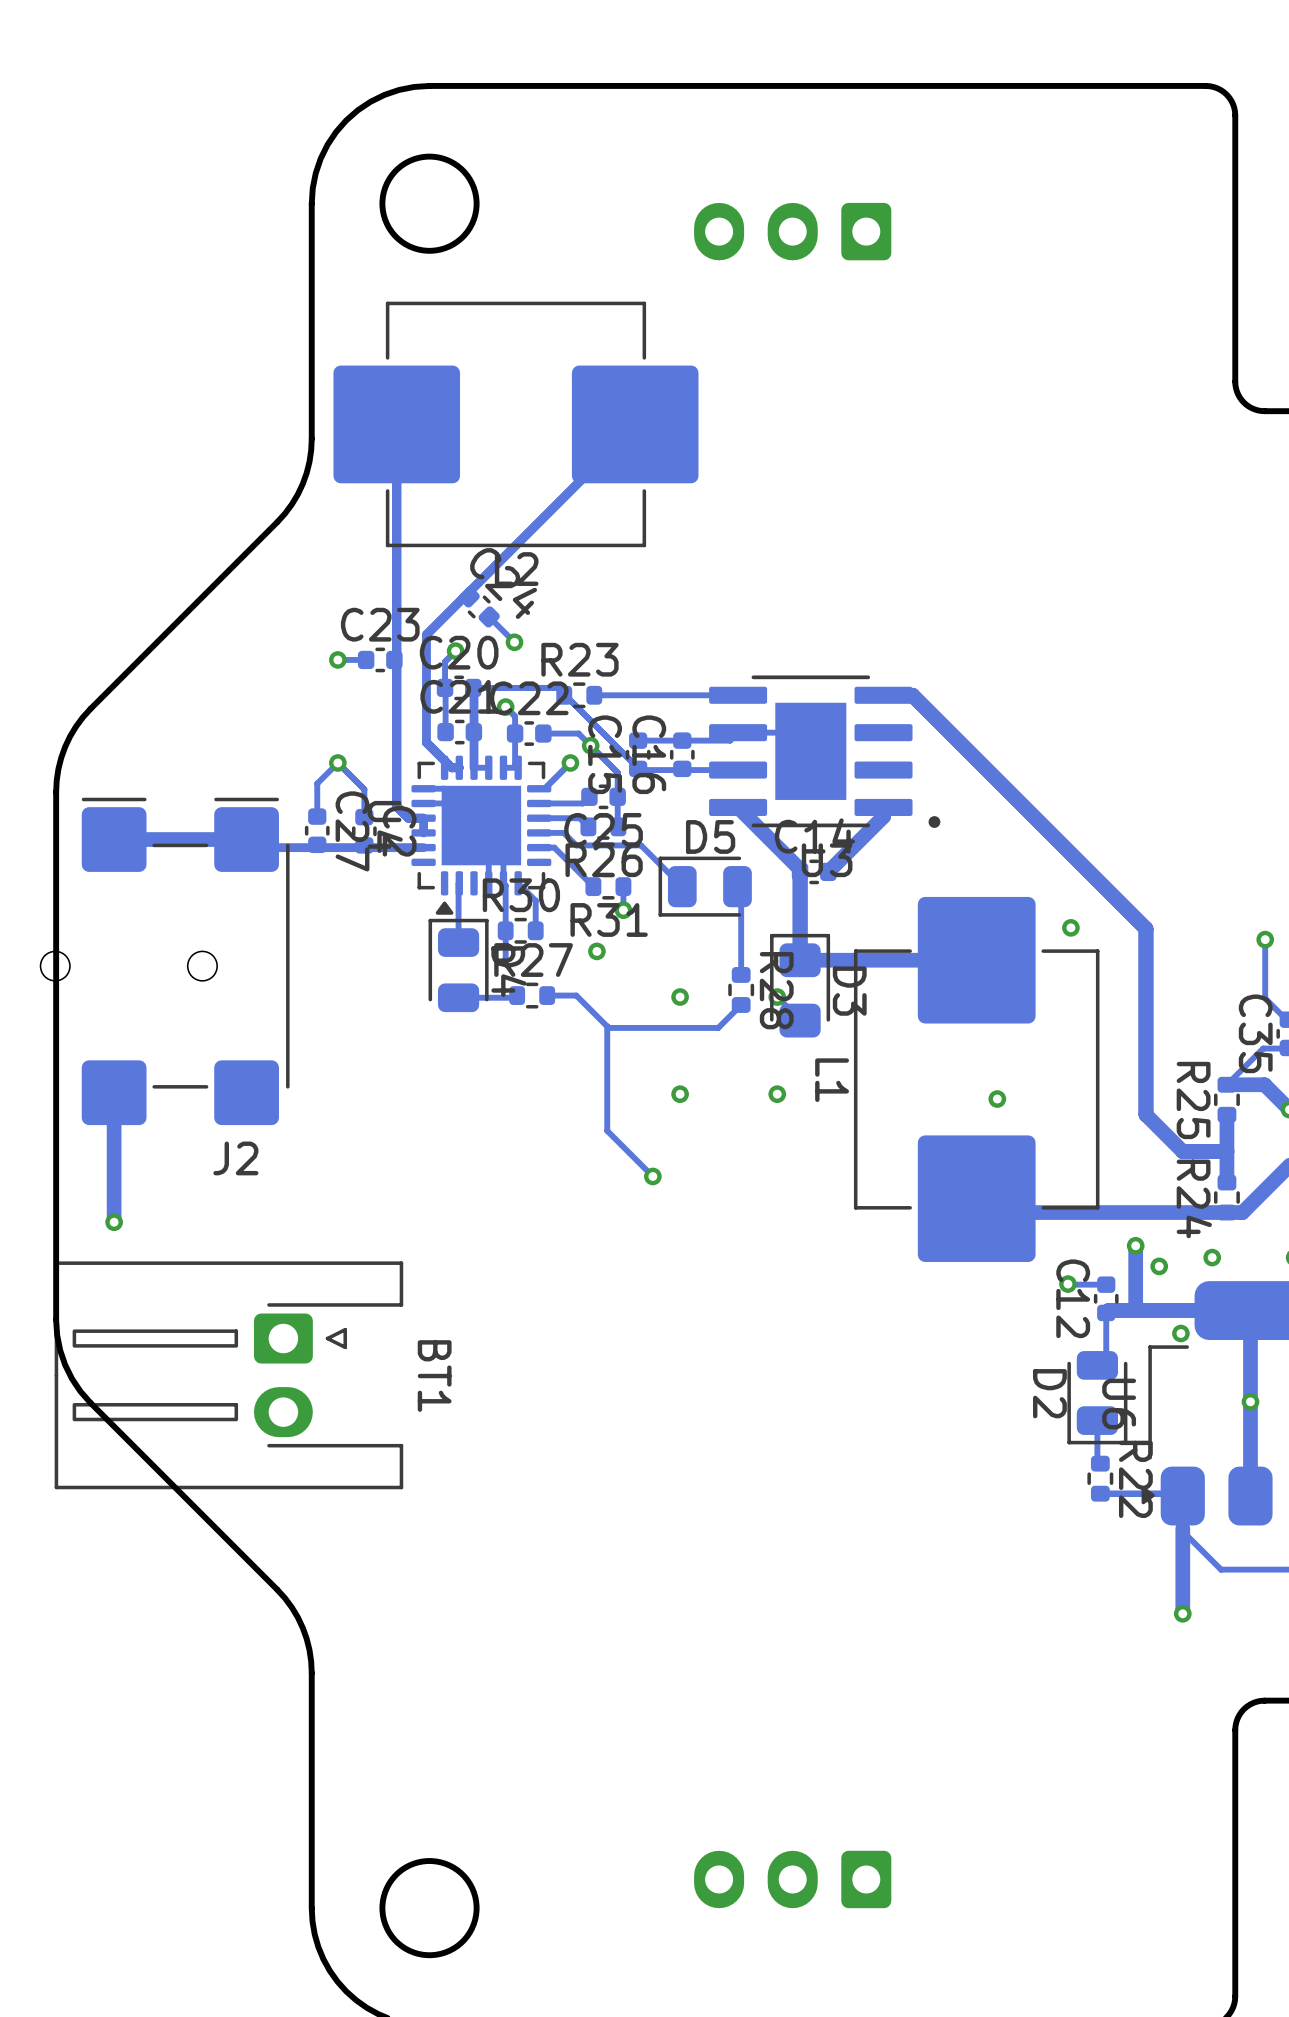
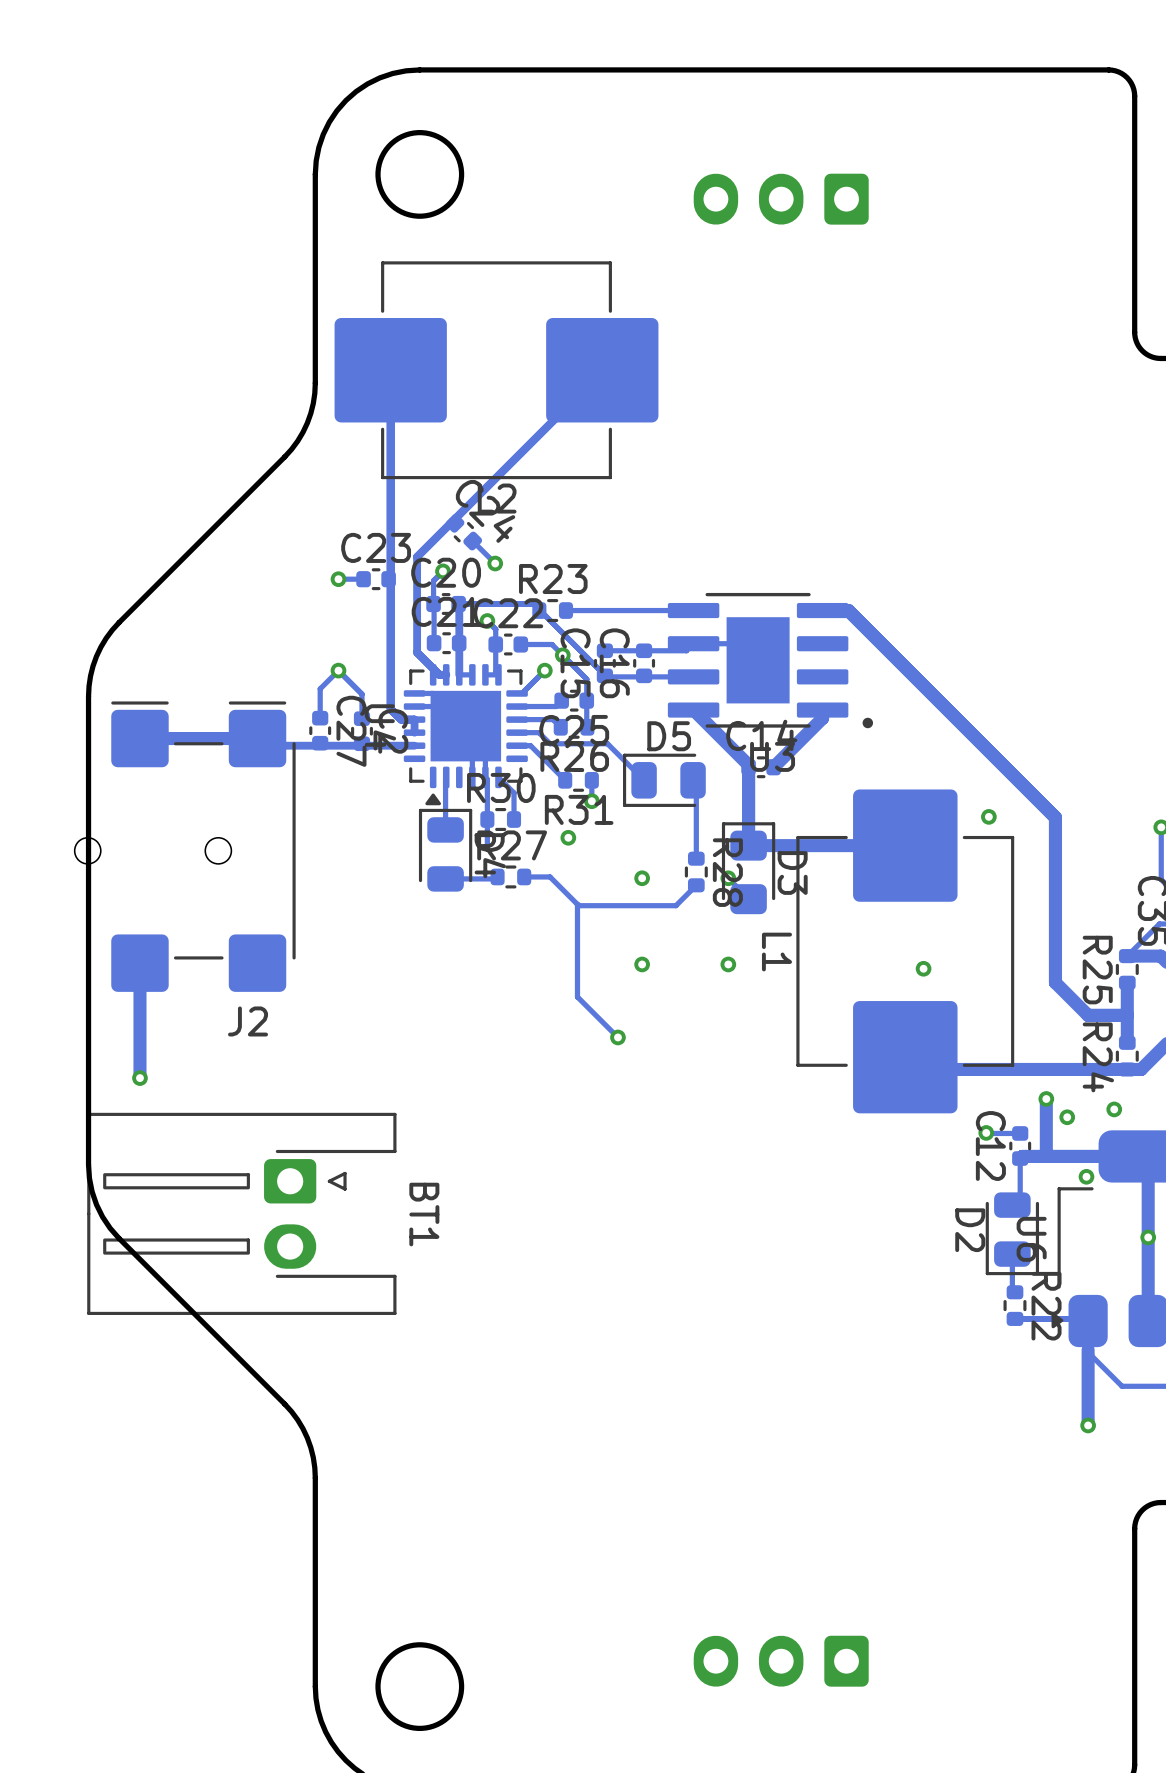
part position: (792, 231) -> (781, 199)
part position: (792, 1879) -> (781, 1661)

